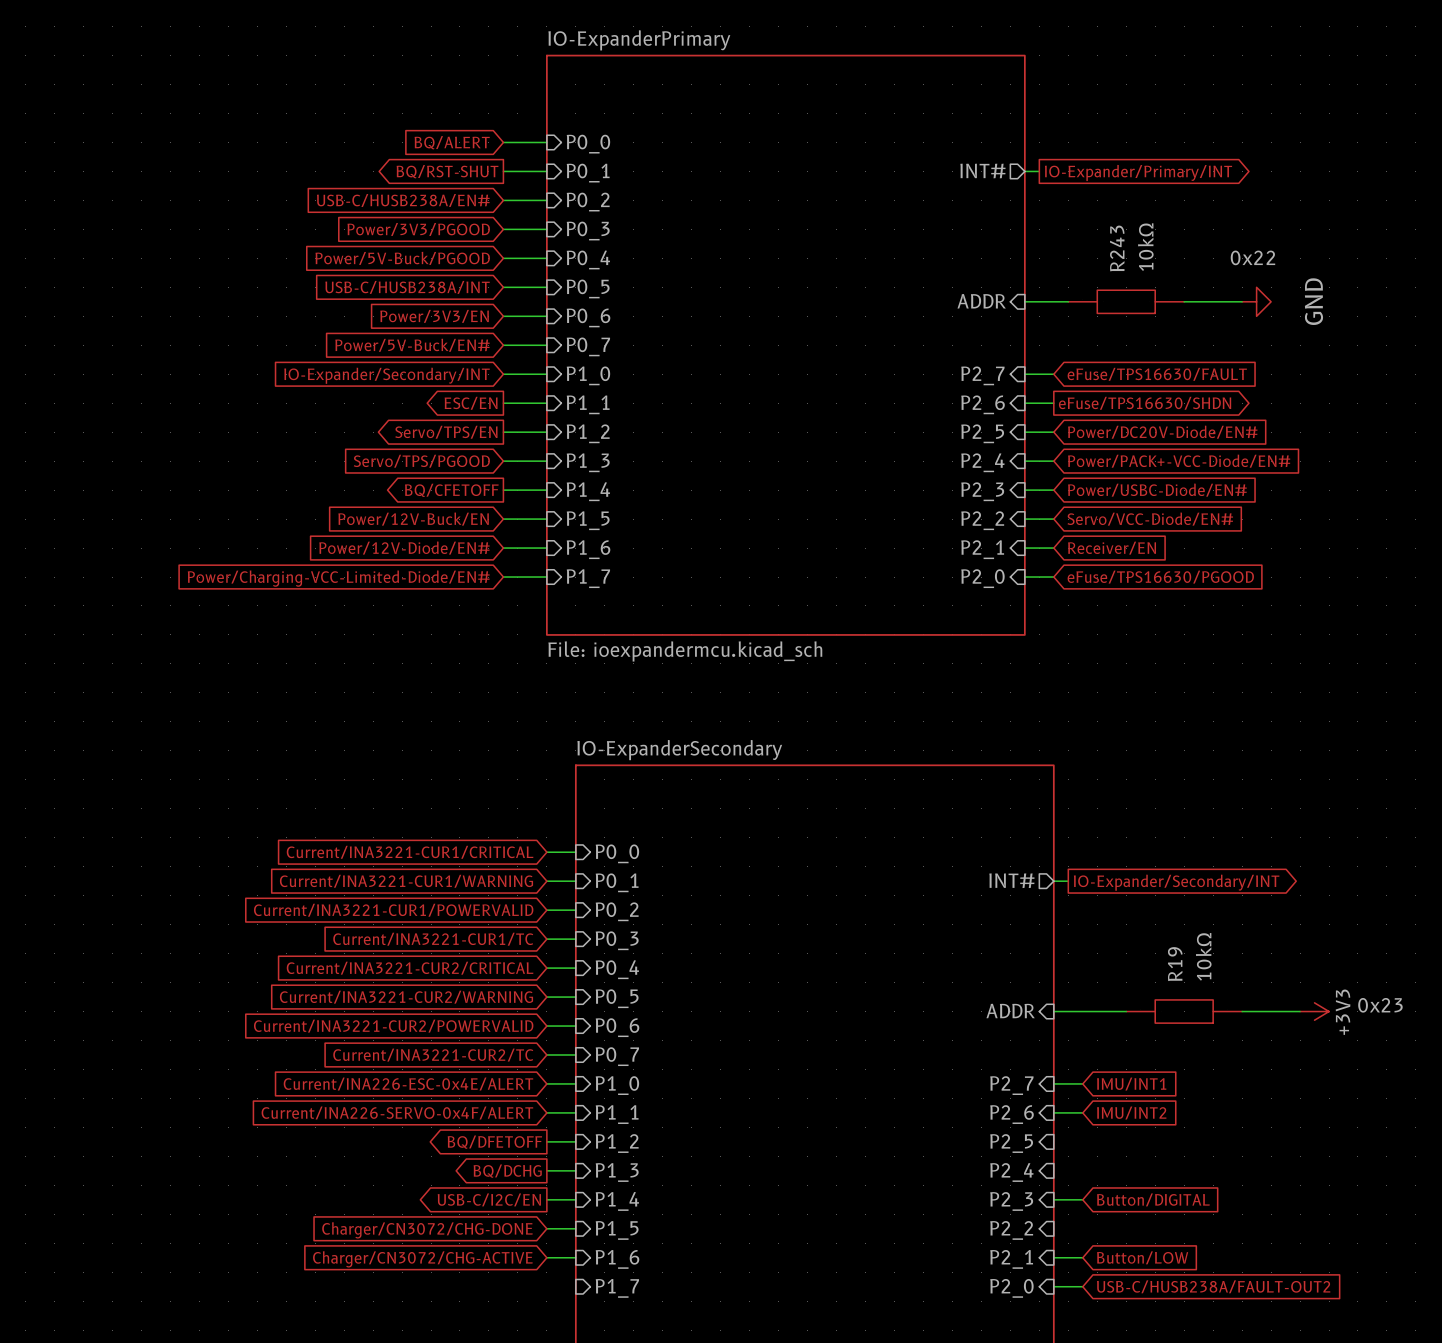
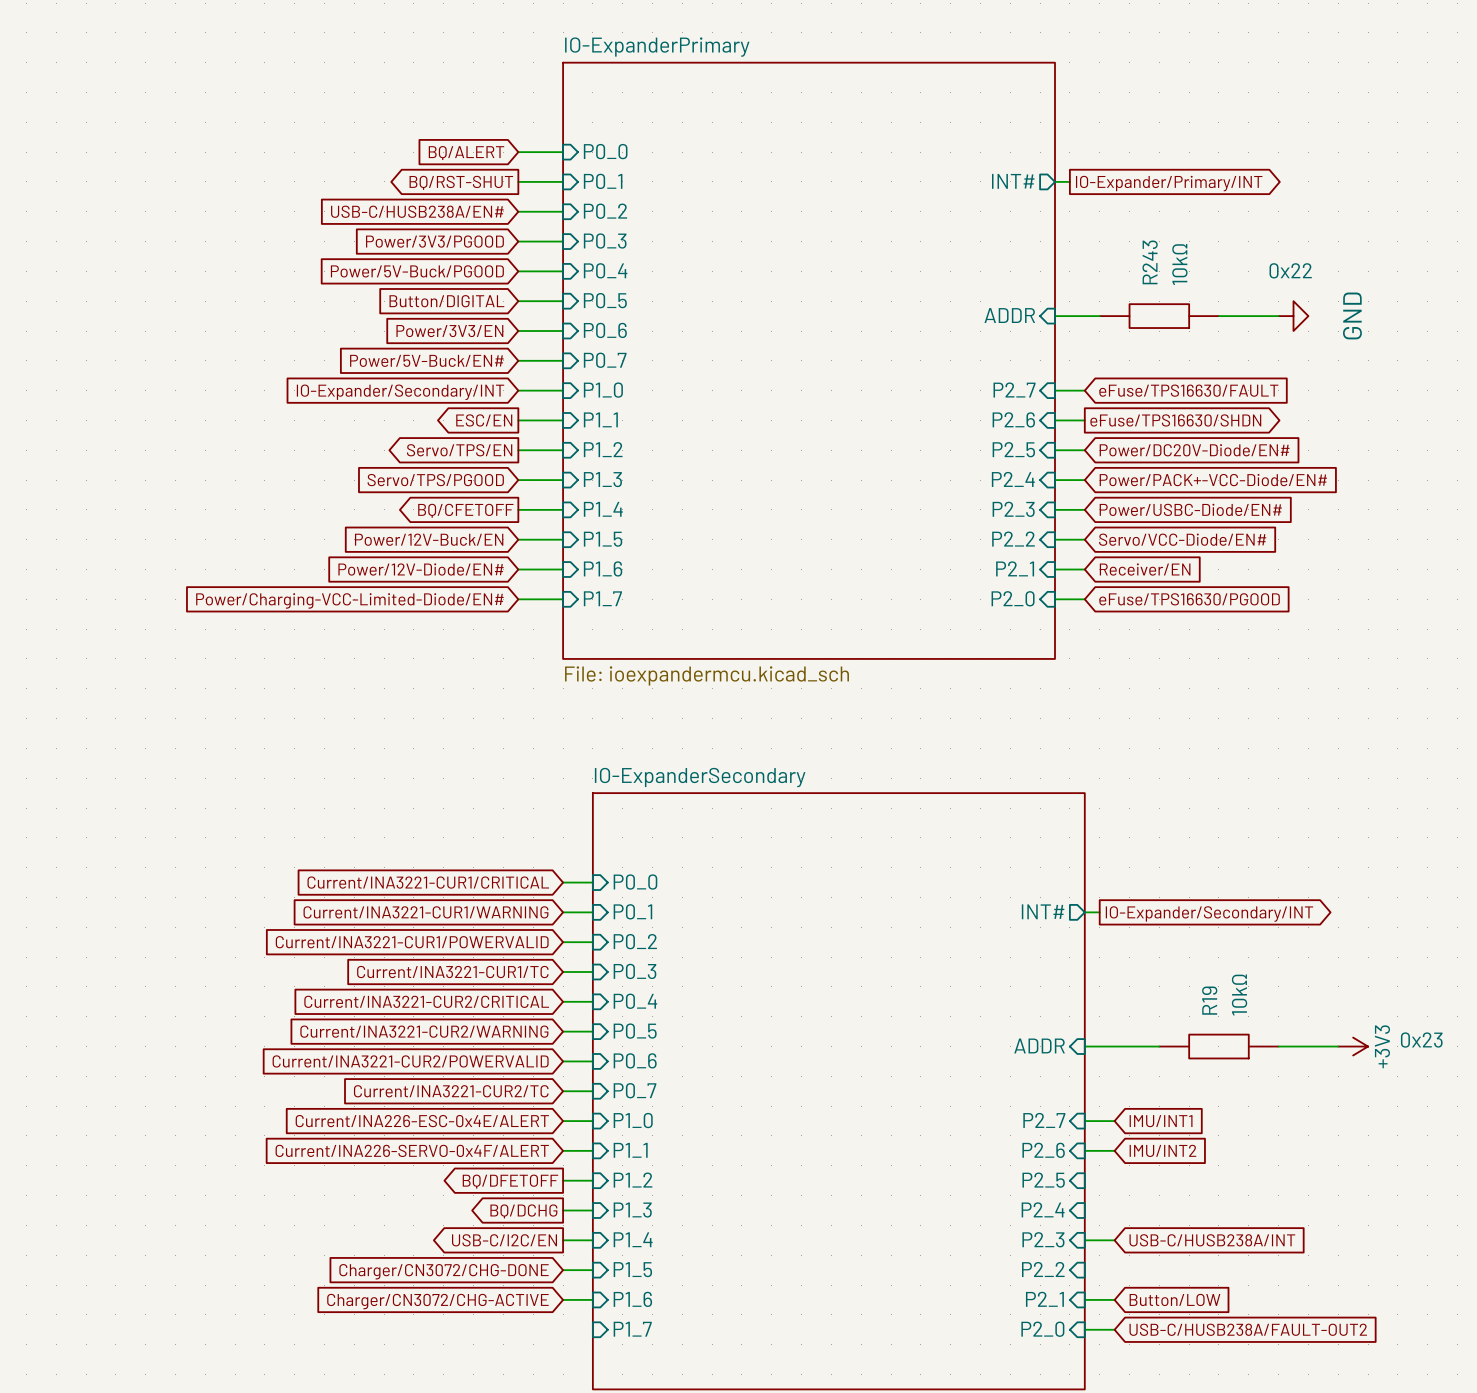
global label: USB-C/HUSB238A/INT (407, 287) -> Button/DIGITAL (446, 301)
global label: Button/DIGITAL (1153, 1199) -> USB-C/HUSB238A/INT (1212, 1240)

